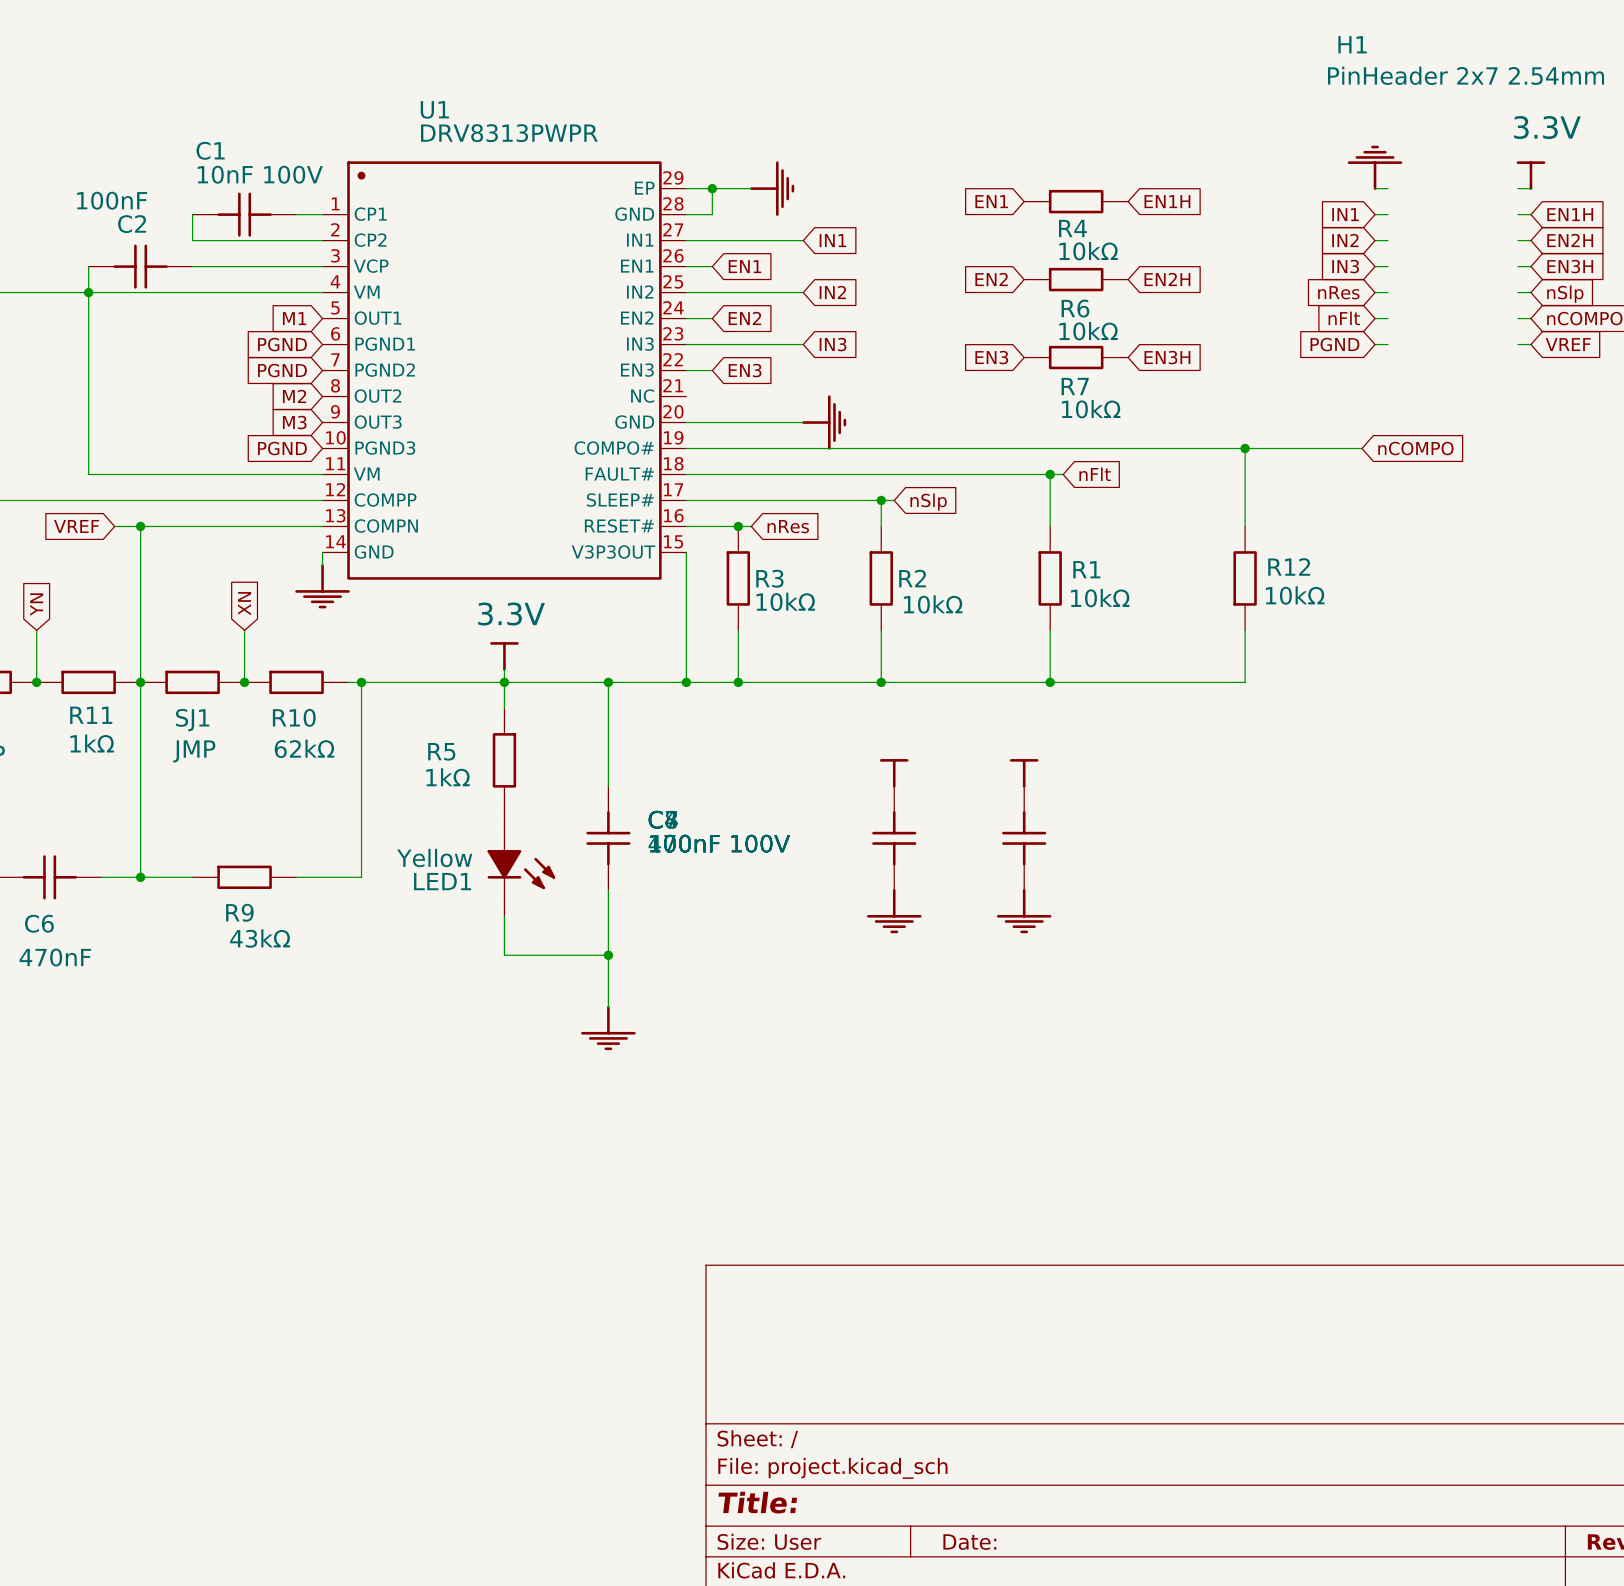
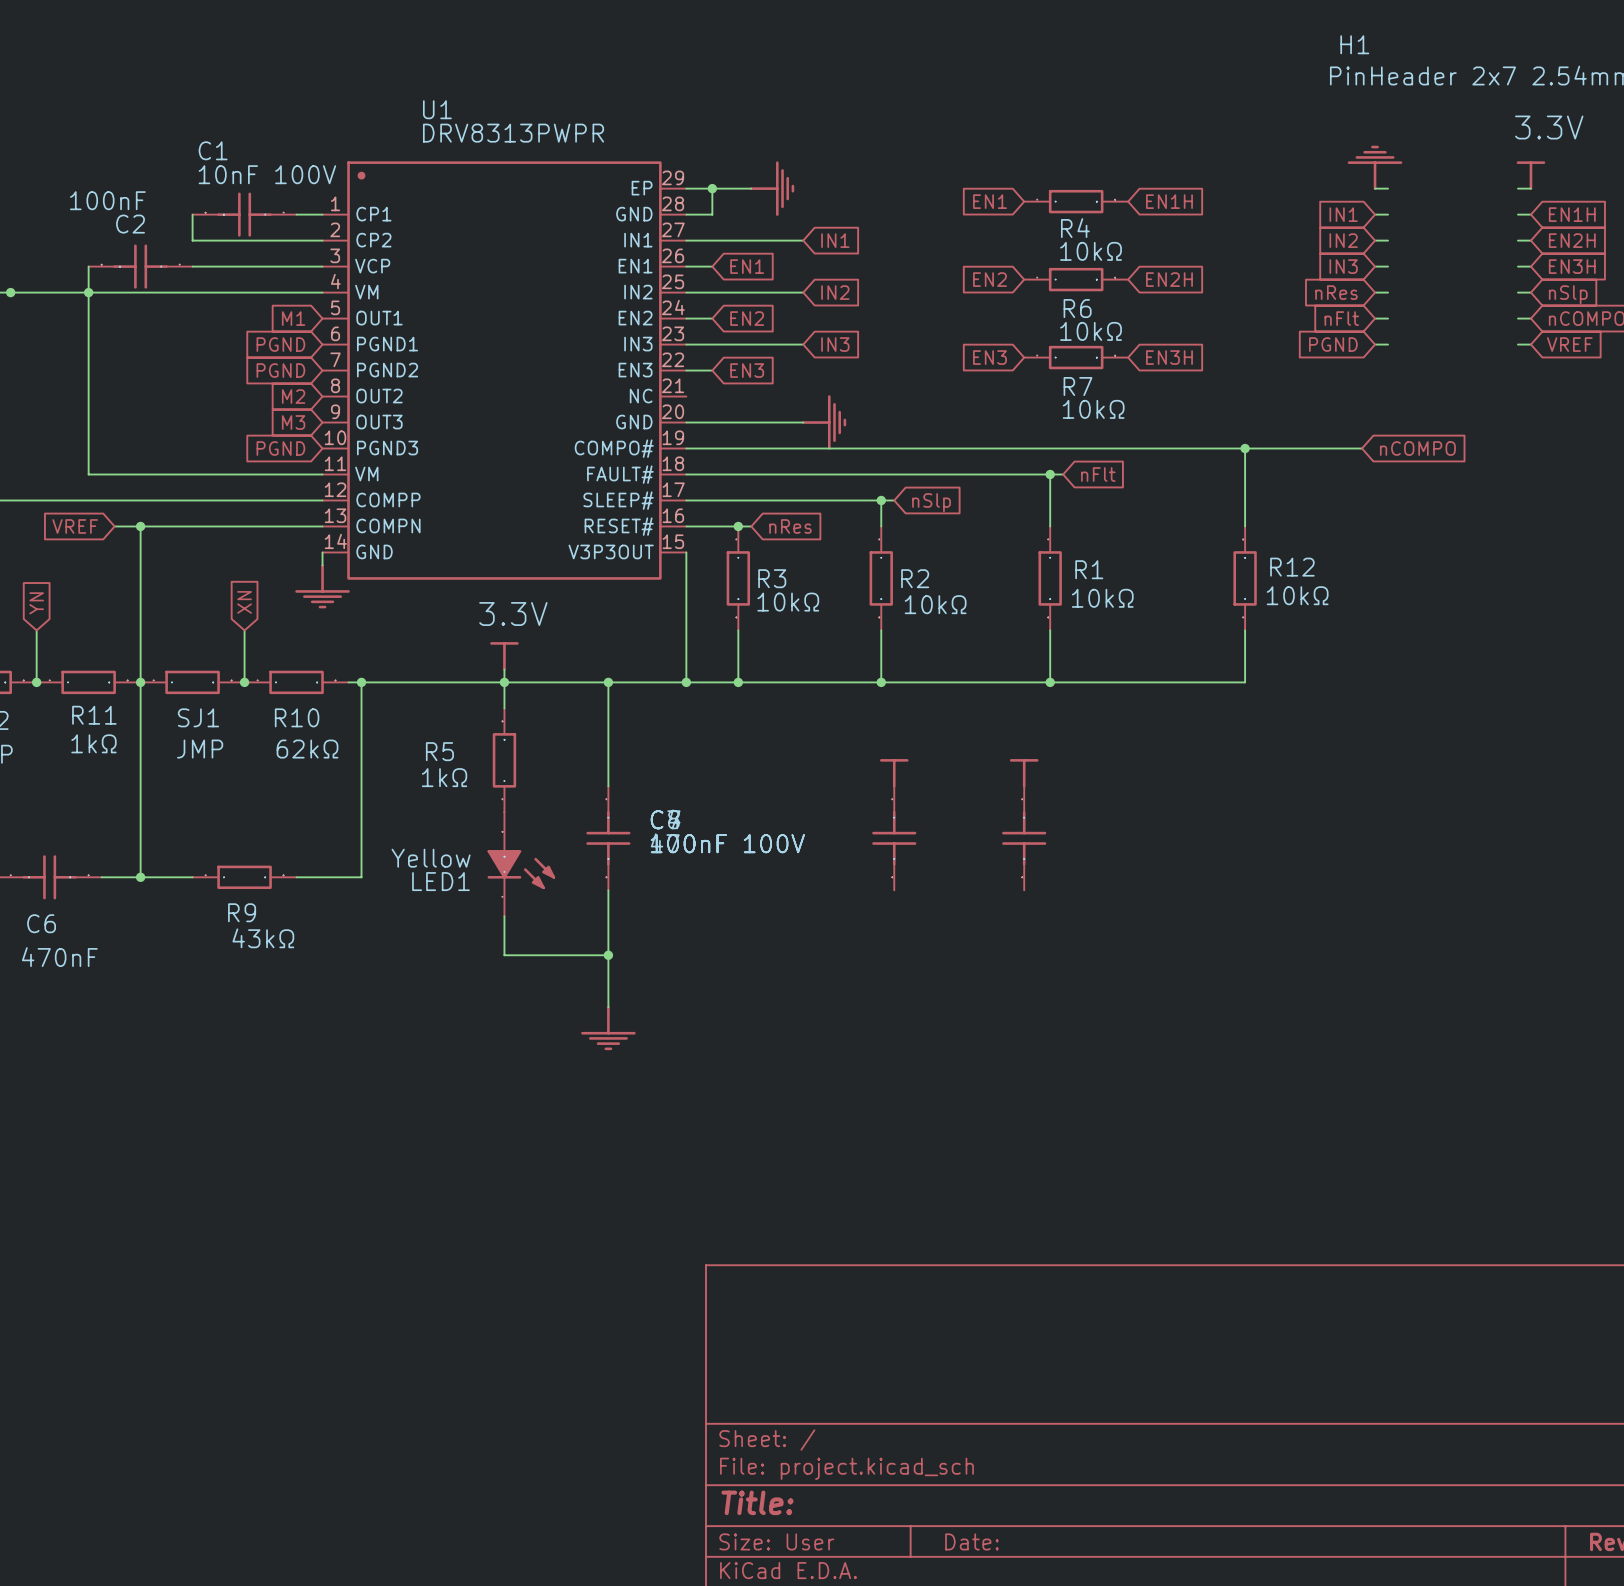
junction: none -> (10, 292)
power symbol: (894, 911) -> none
power symbol: (1024, 911) -> none

